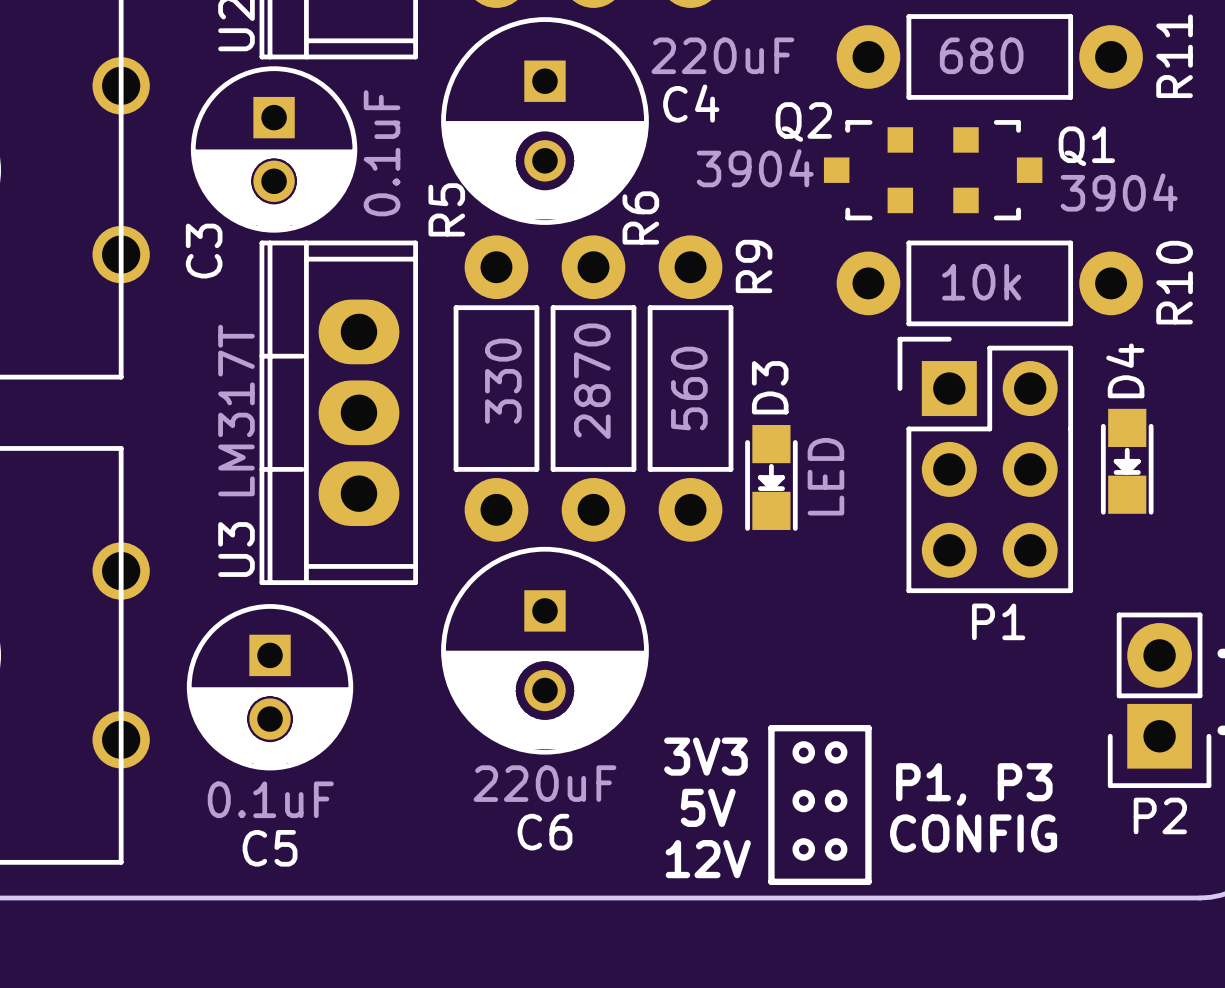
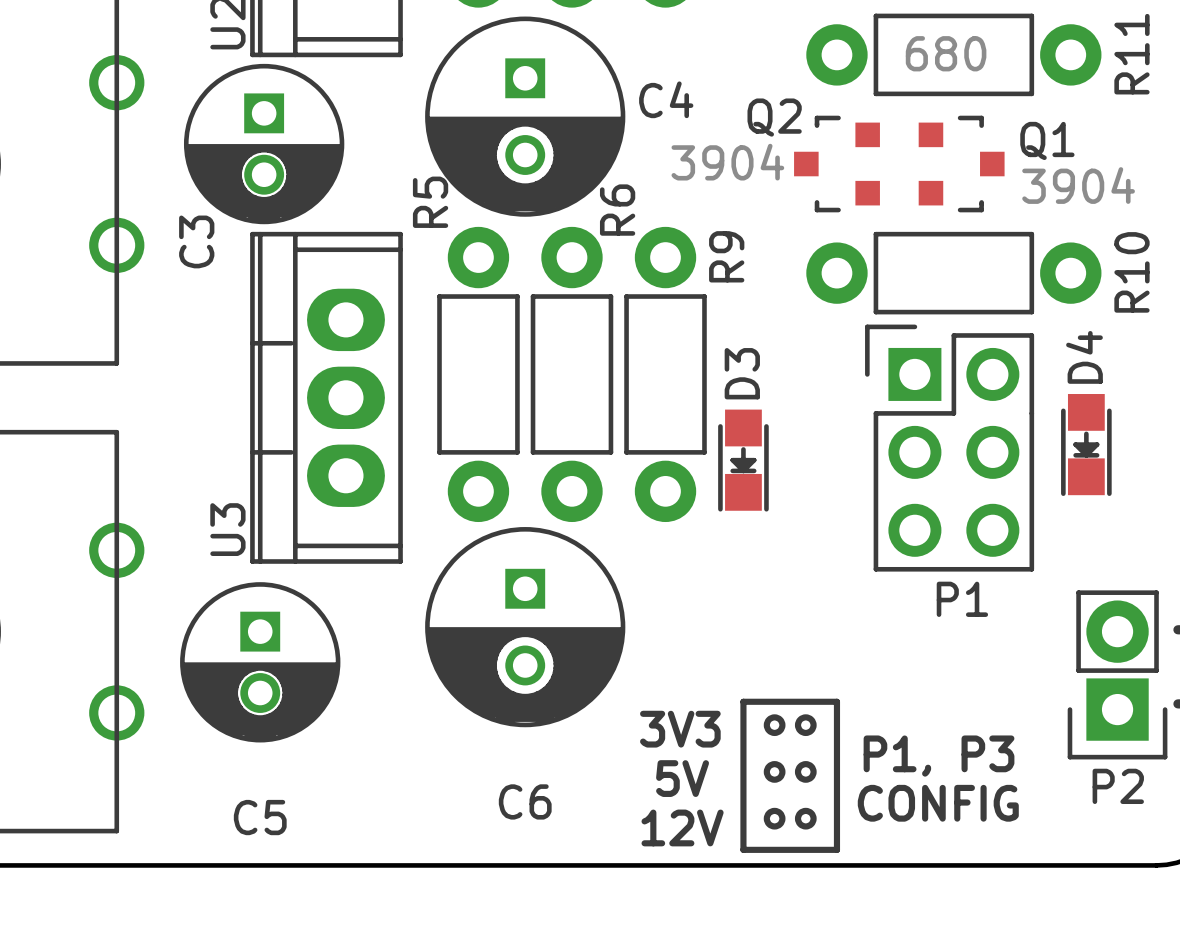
C4 value: 220uF (722, 55) -> none
C3 value: 0.1uF (382, 153) -> none
R10 value: 10k (981, 282) -> none
R5 value: 330 (503, 381) -> none
R6 value: 2870 (592, 381) -> none
R9 value: 560 (689, 388) -> none
U3 value: LM317T (236, 410) -> none
D3 value: LED (825, 476) -> none
C6 value: 220uF (544, 783) -> none
C5 value: 0.1uF (270, 799) -> none

